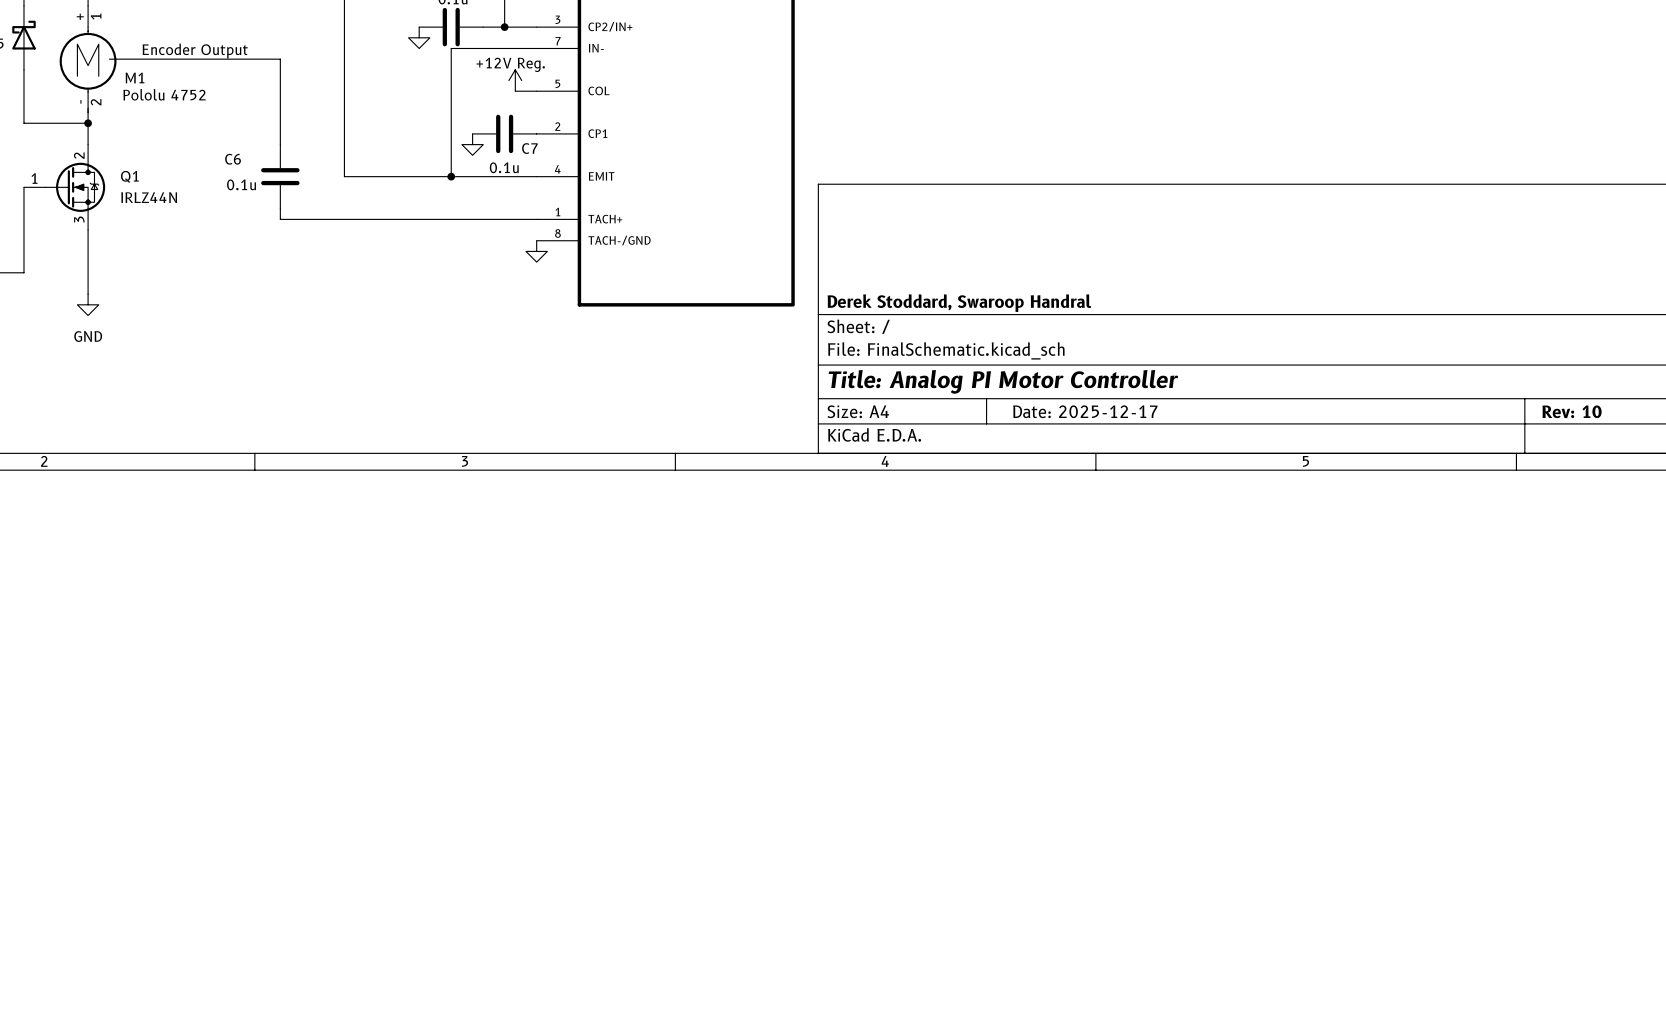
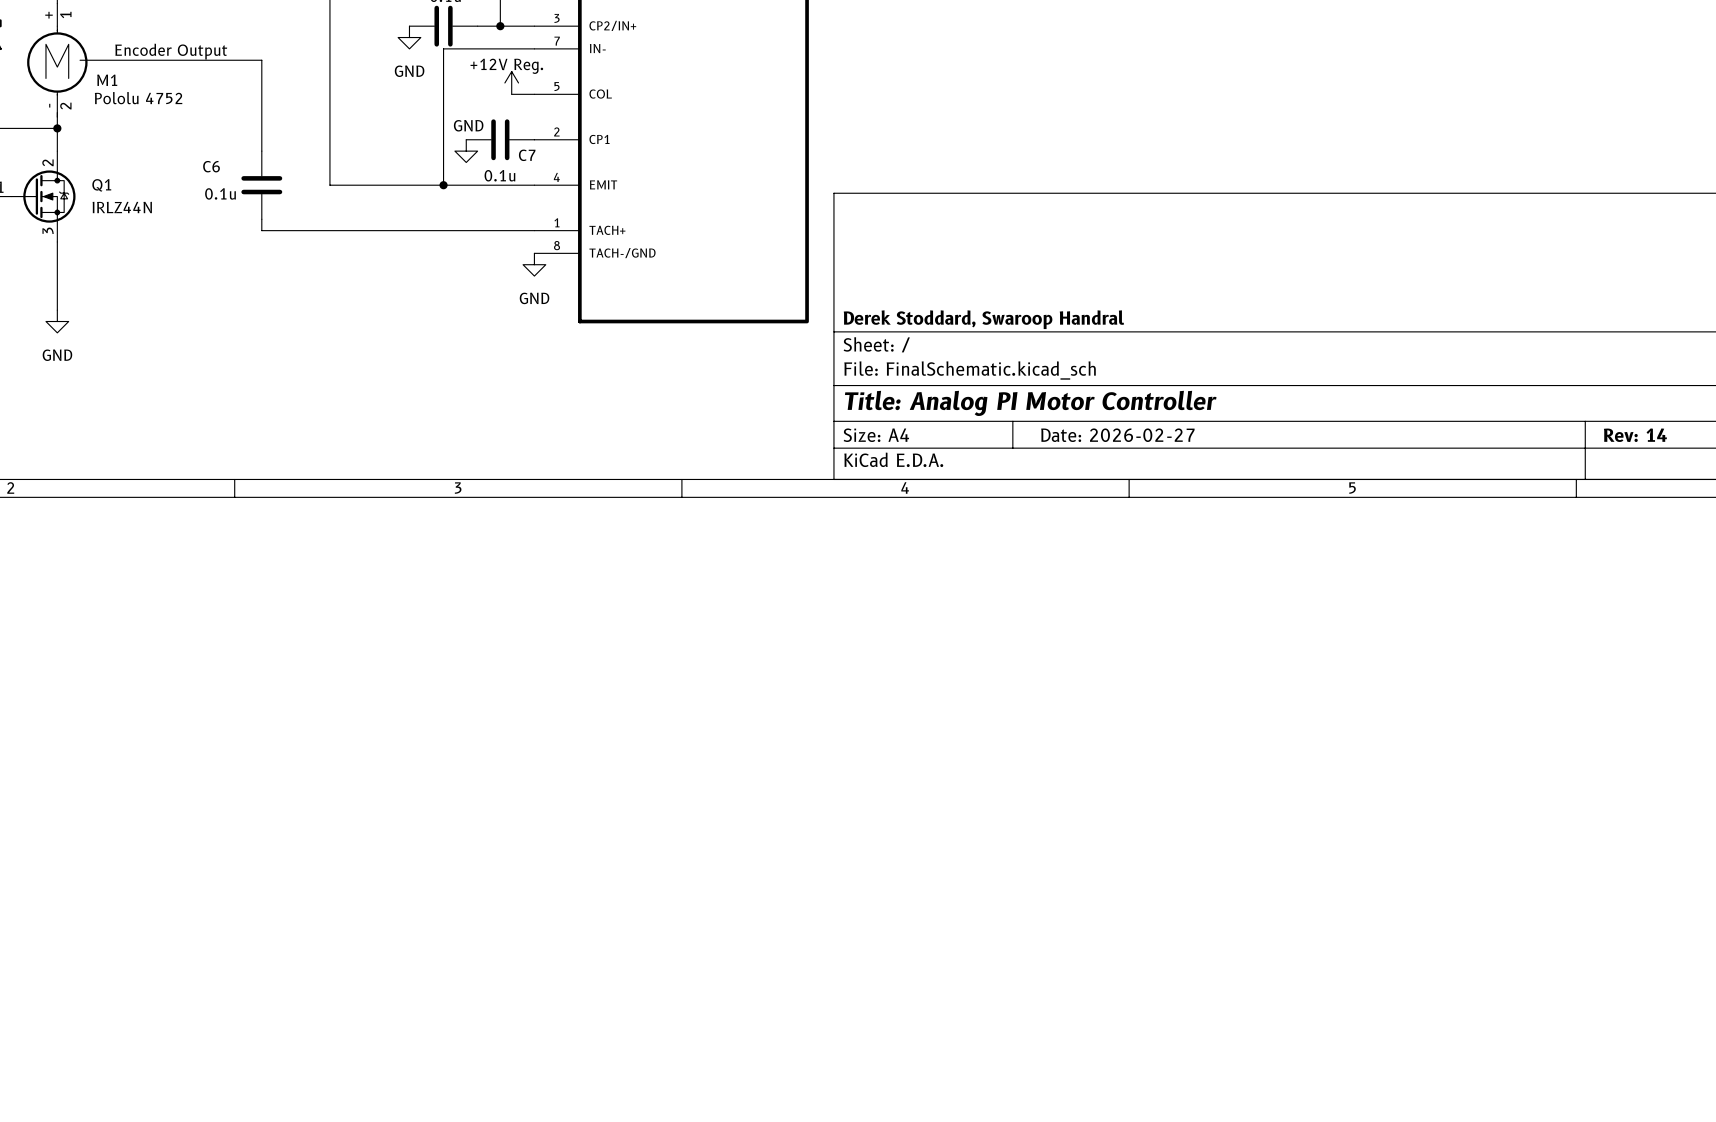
power symbol text: none -> GND (409, 71)
power symbol text: none -> GND (468, 125)
power symbol text: none -> GND (534, 298)
title block: Date: 2025-12-17 (1085, 411) -> Date: 2026-02-27 (1117, 435)
title block: Rev: 10 (1571, 411) -> Rev: 14 (1635, 435)

